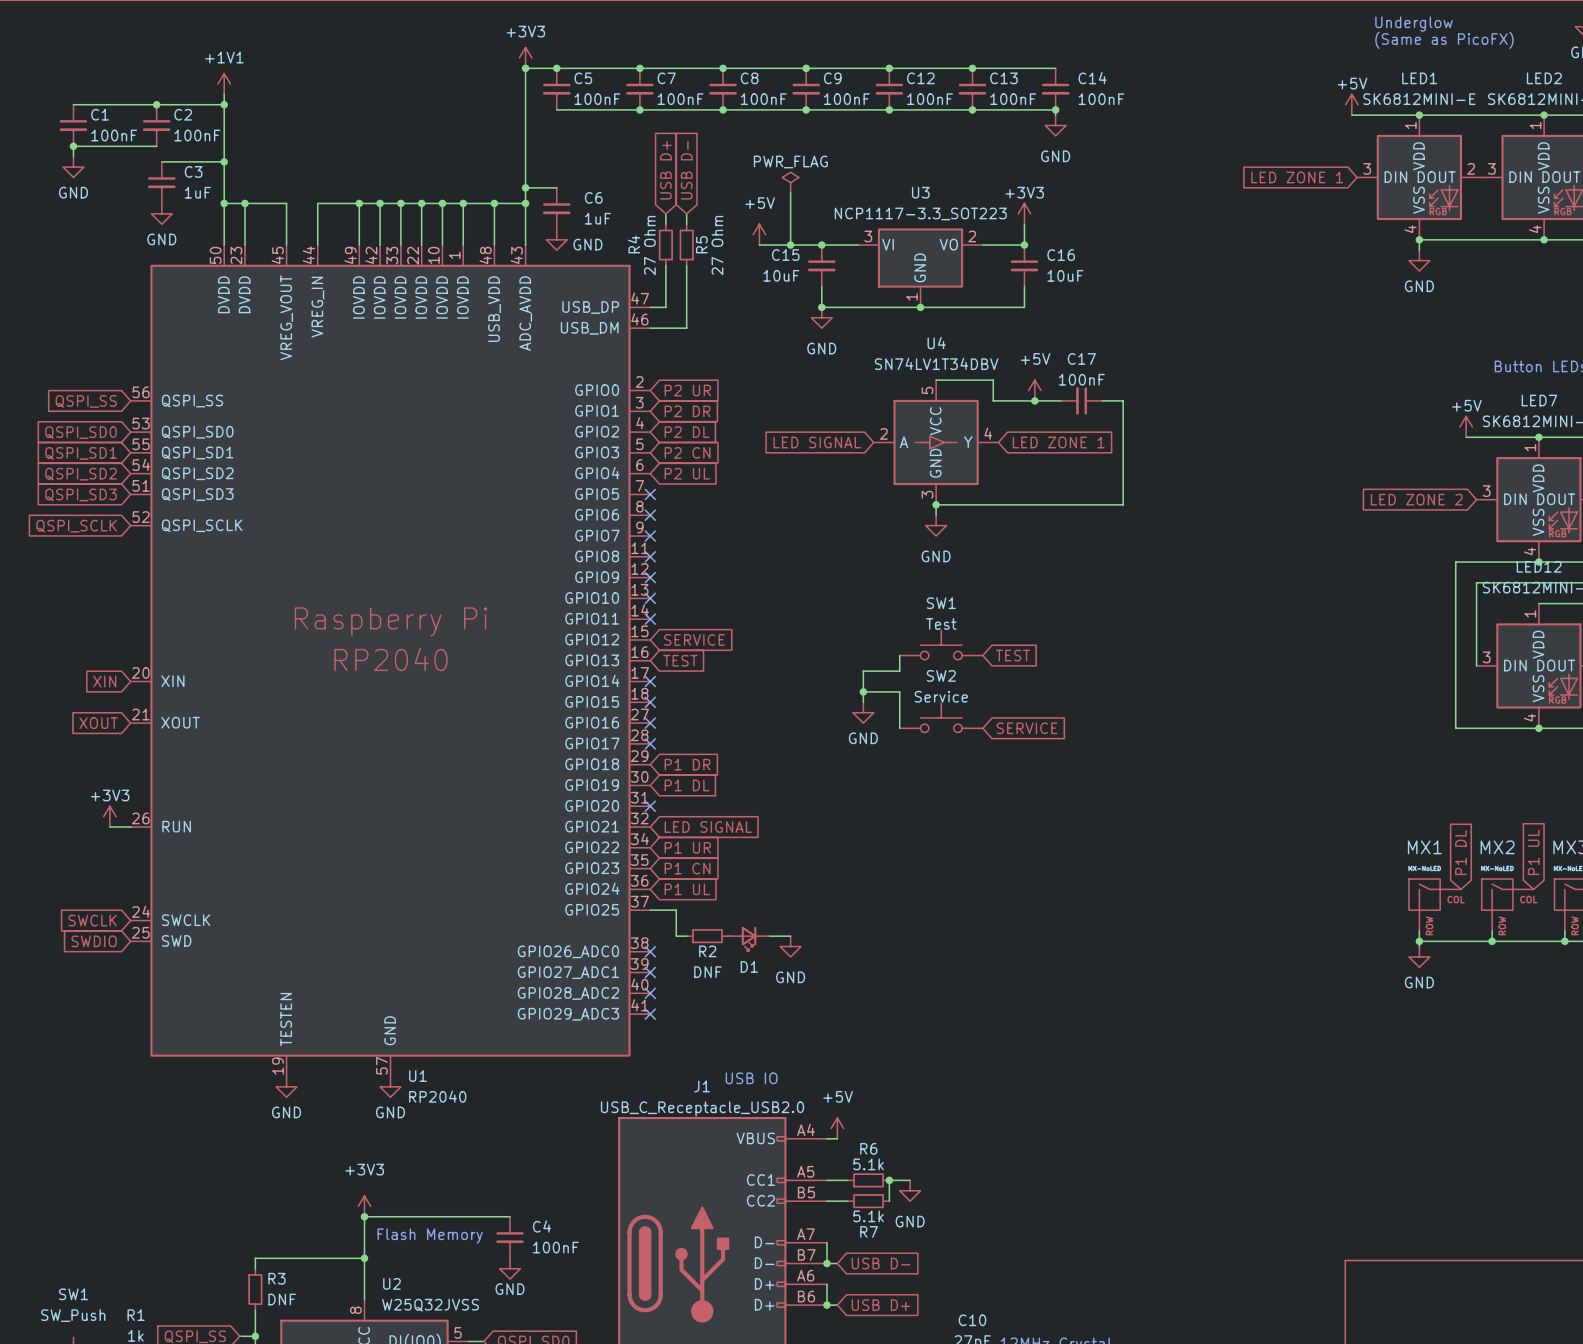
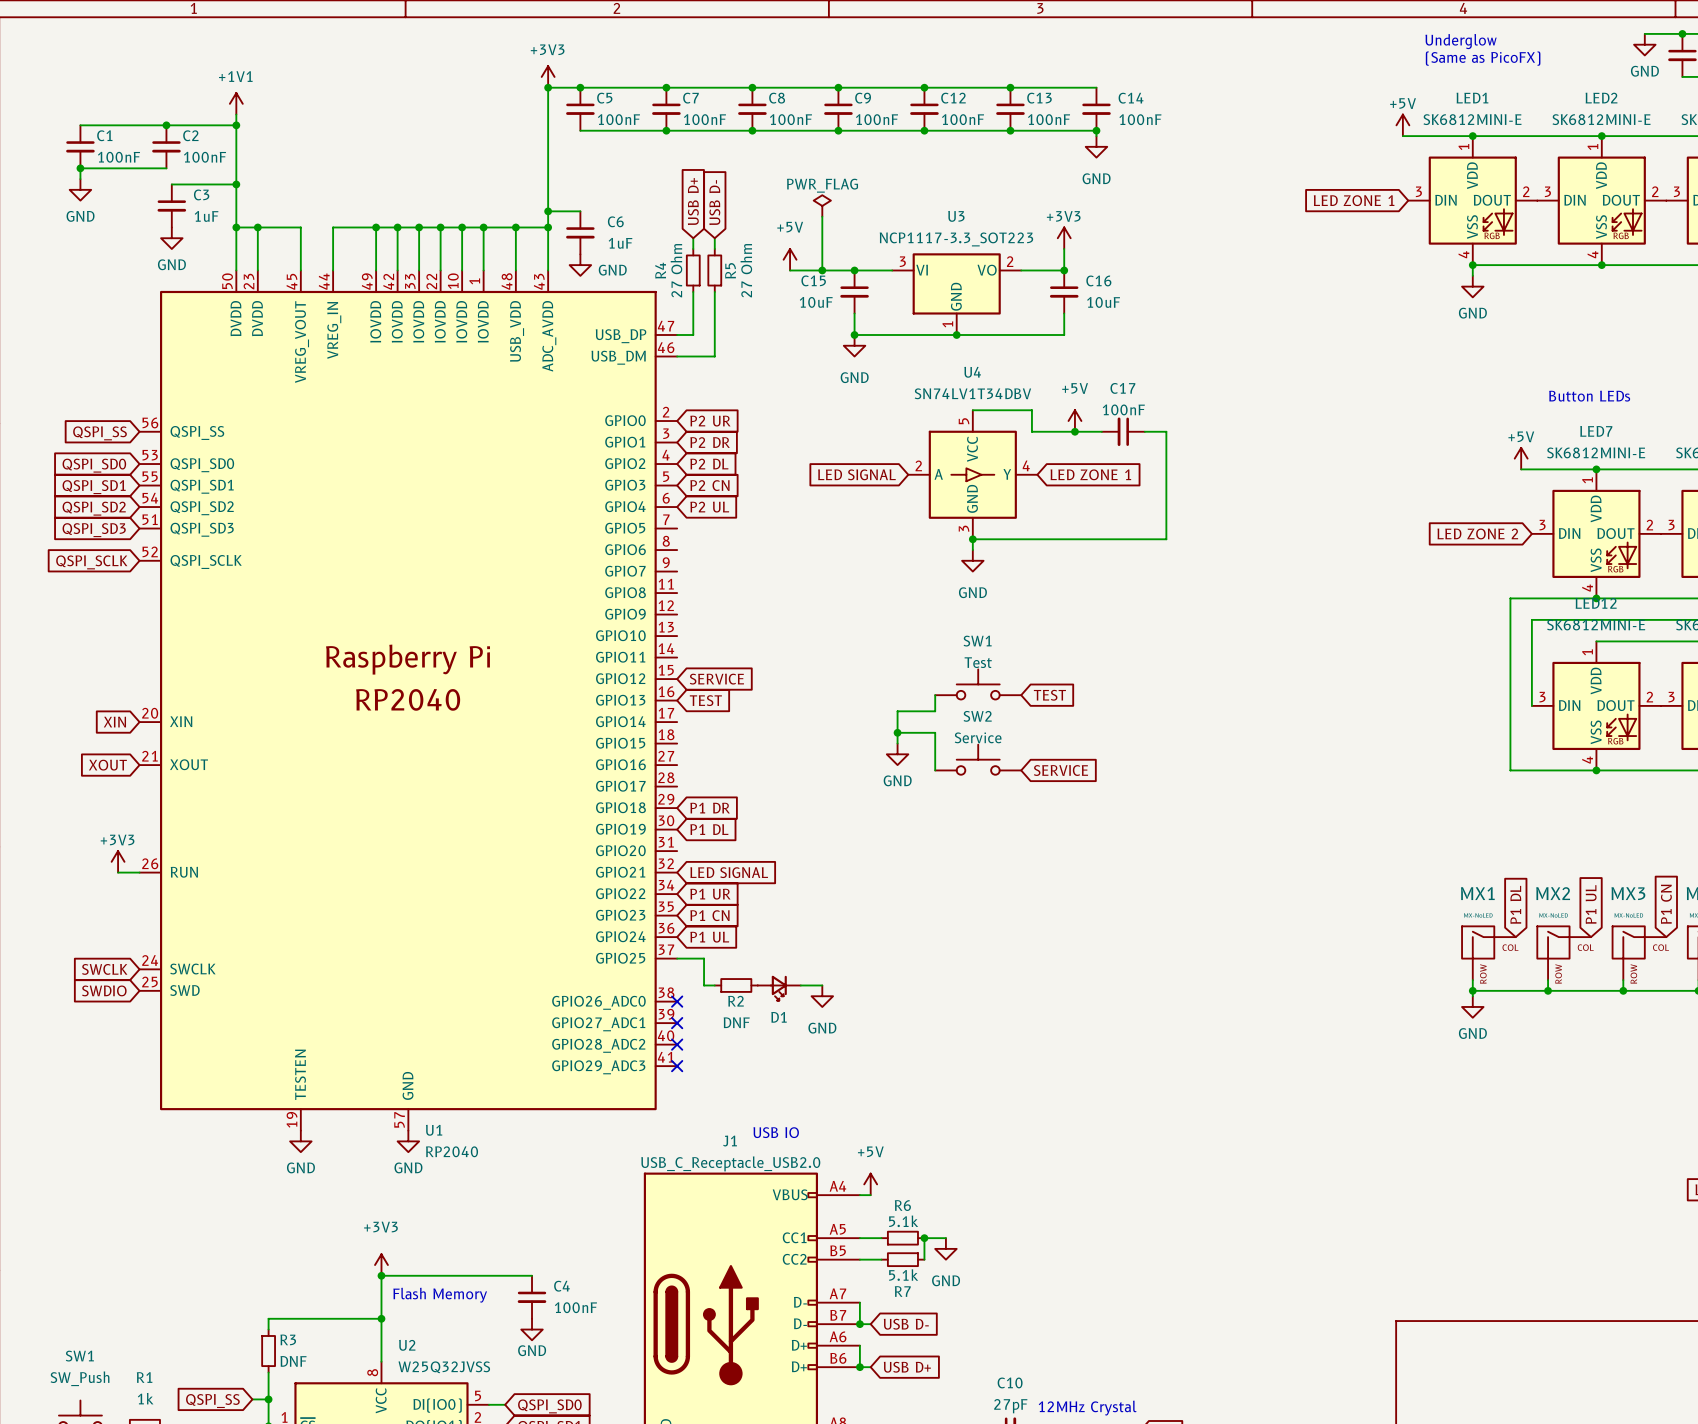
no-connect mark: (650, 494) -> none
no-connect mark: (650, 515) -> none
no-connect mark: (650, 536) -> none
no-connect mark: (650, 556) -> none
no-connect mark: (650, 577) -> none
no-connect mark: (650, 598) -> none
no-connect mark: (650, 619) -> none
no-connect mark: (650, 681) -> none
no-connect mark: (650, 702) -> none
no-connect mark: (650, 723) -> none
no-connect mark: (650, 743) -> none
no-connect mark: (650, 806) -> none

